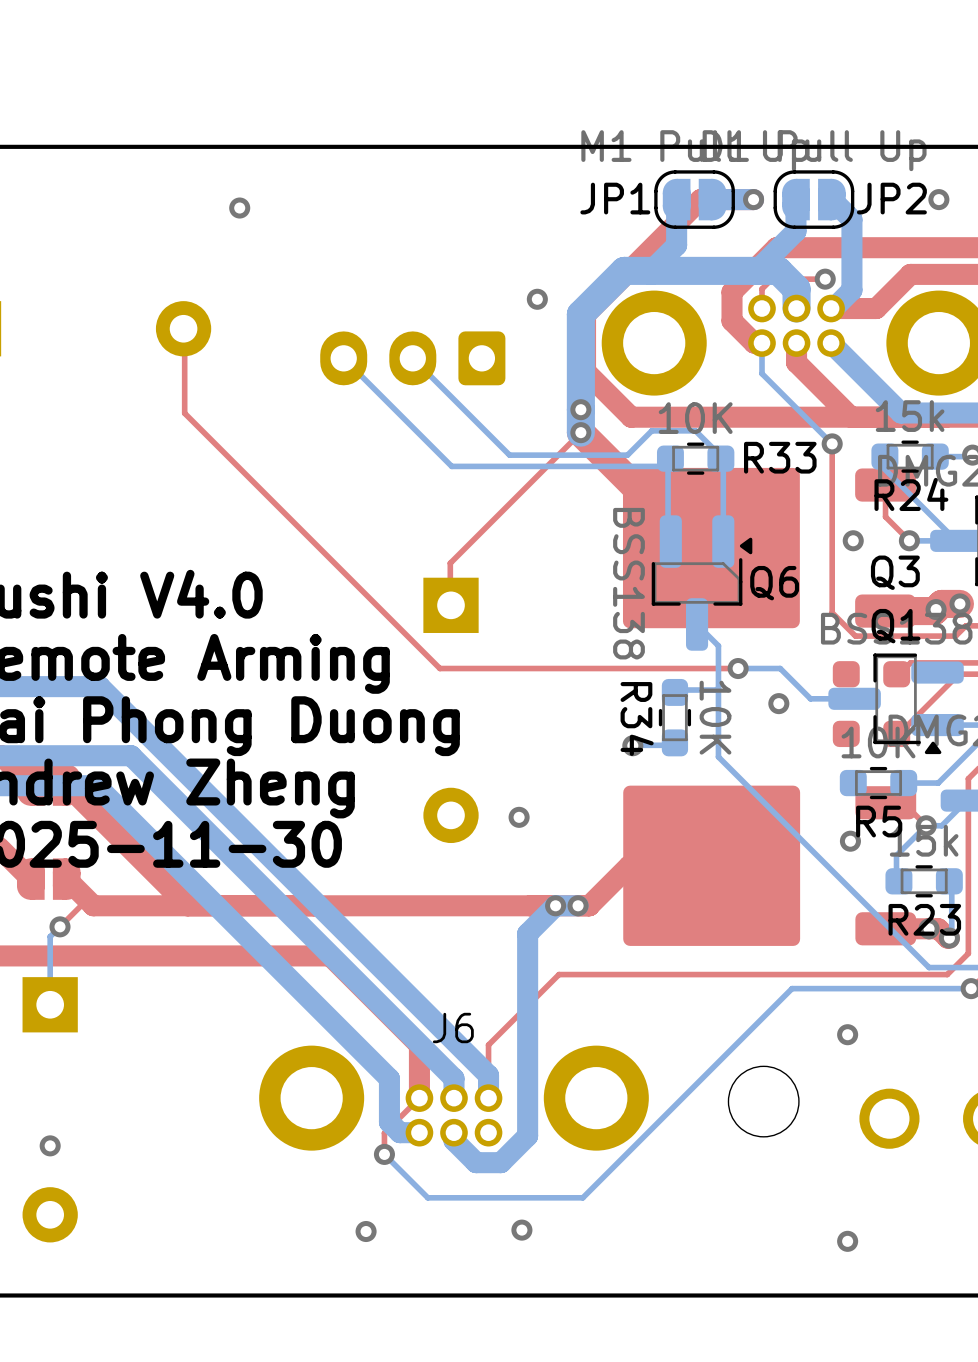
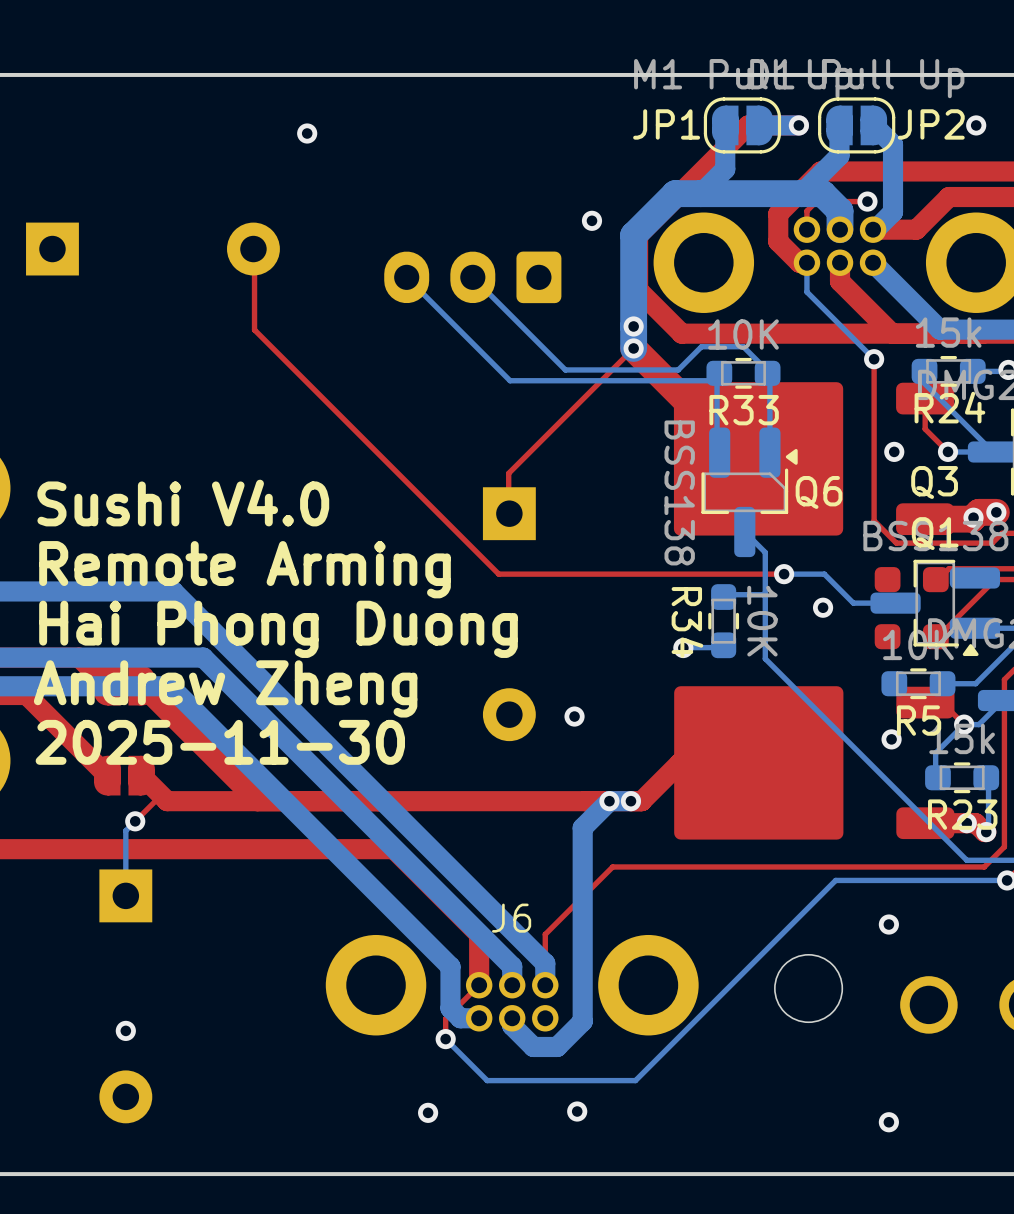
R33 name position: R33 (780, 457) -> R33 (744, 410)

